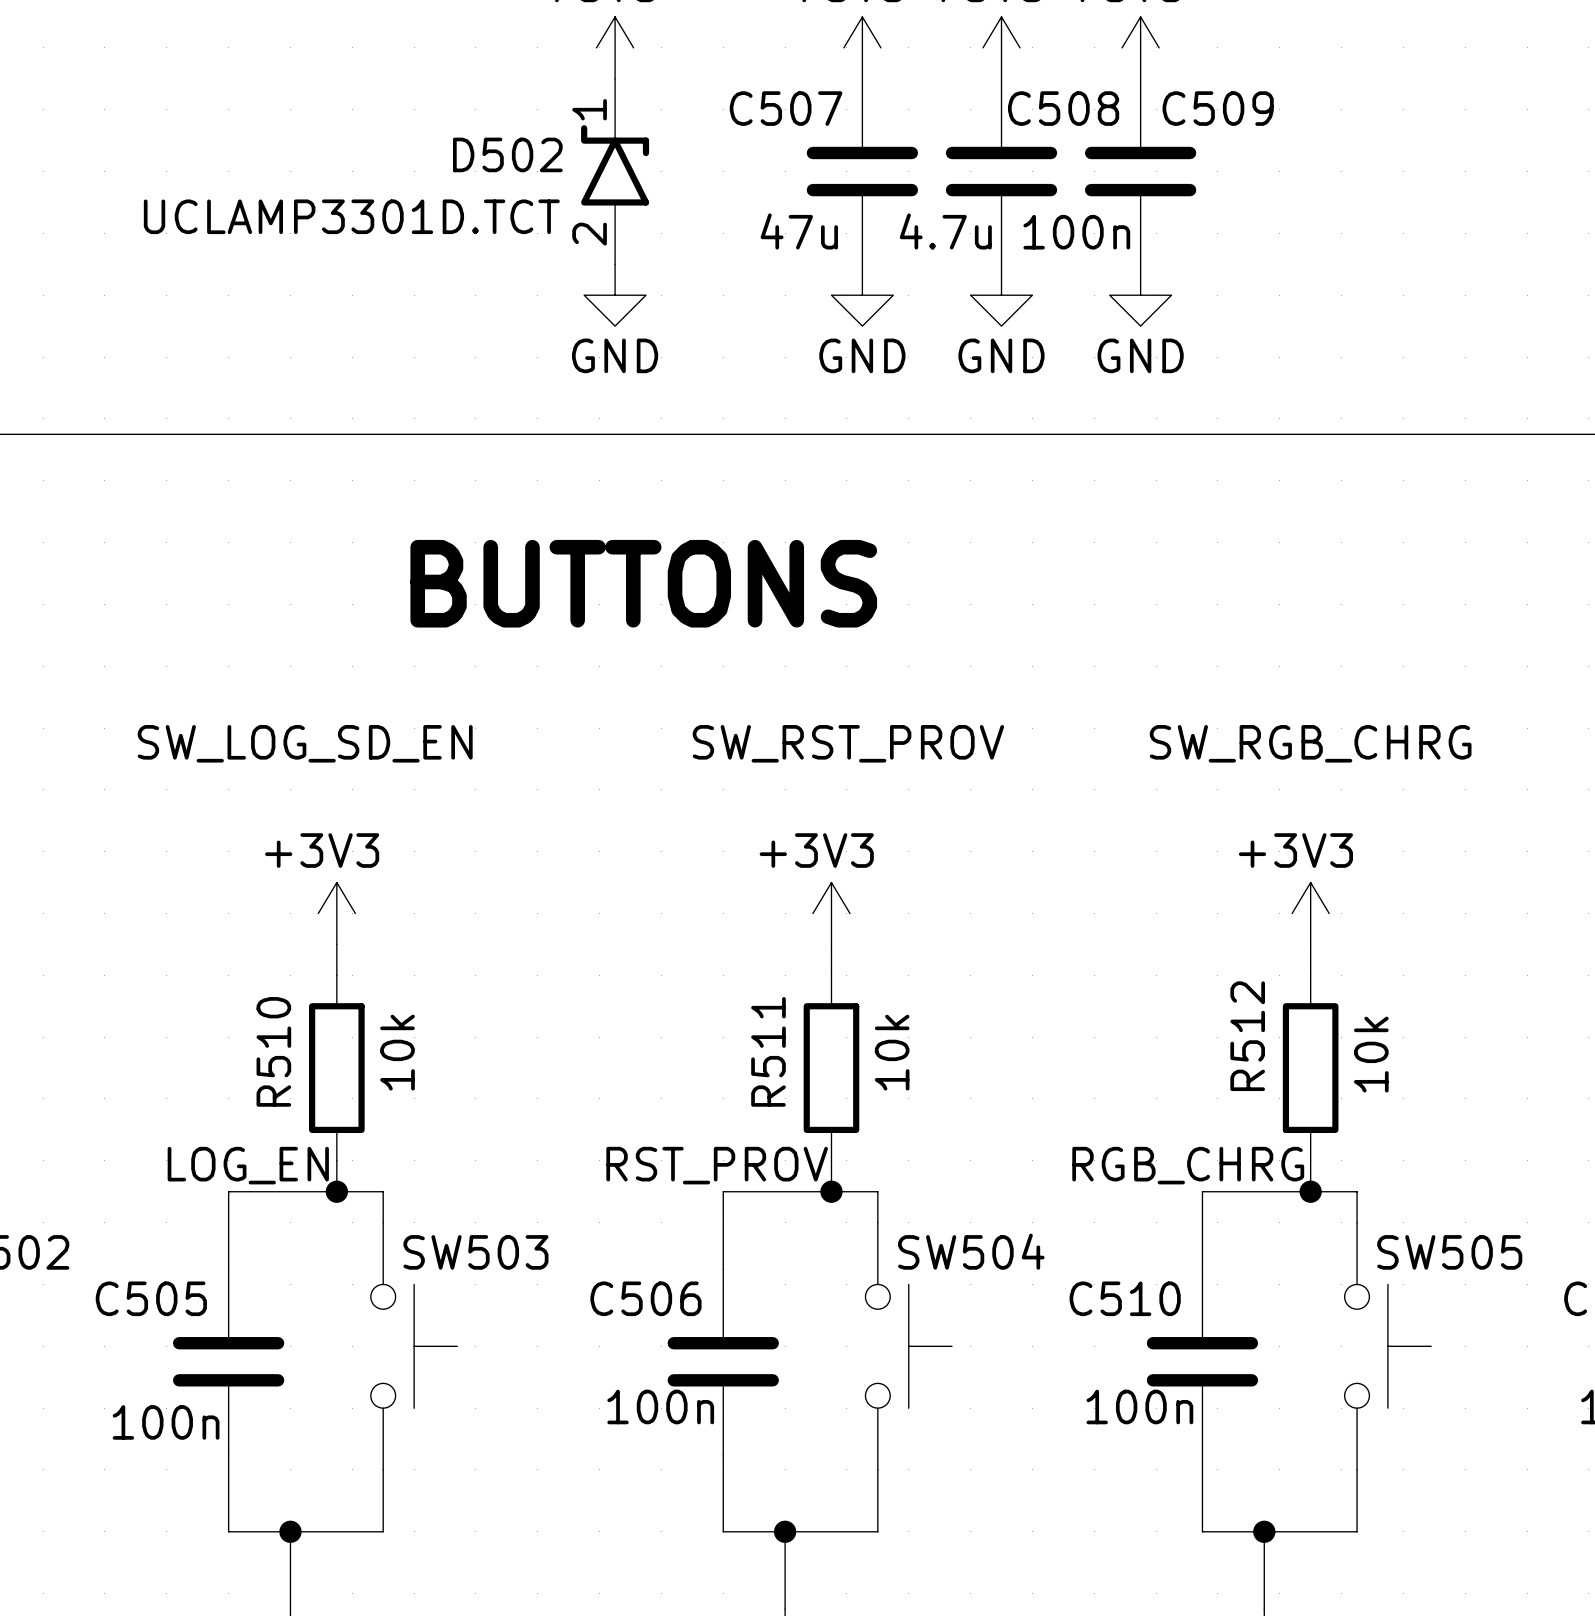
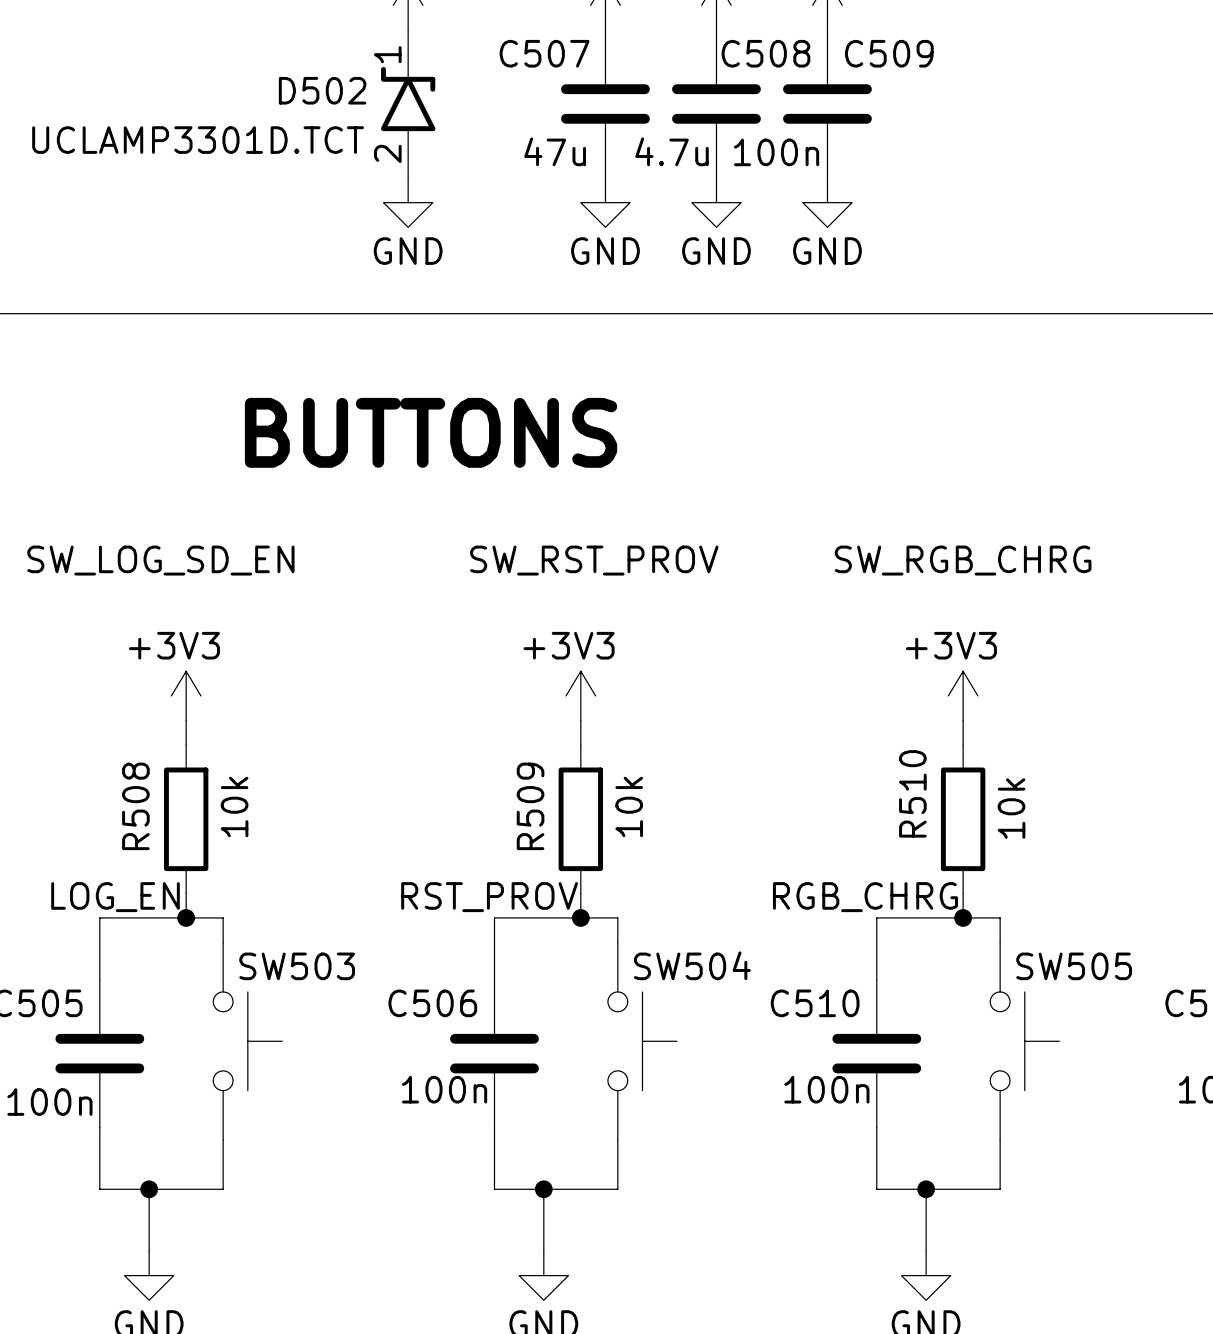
R512 name: R512 (1247, 1036) -> R510 (912, 793)
R510 name: R510 (273, 1051) -> R508 (135, 806)
R511 name: R511 (768, 1051) -> R509 (530, 806)

